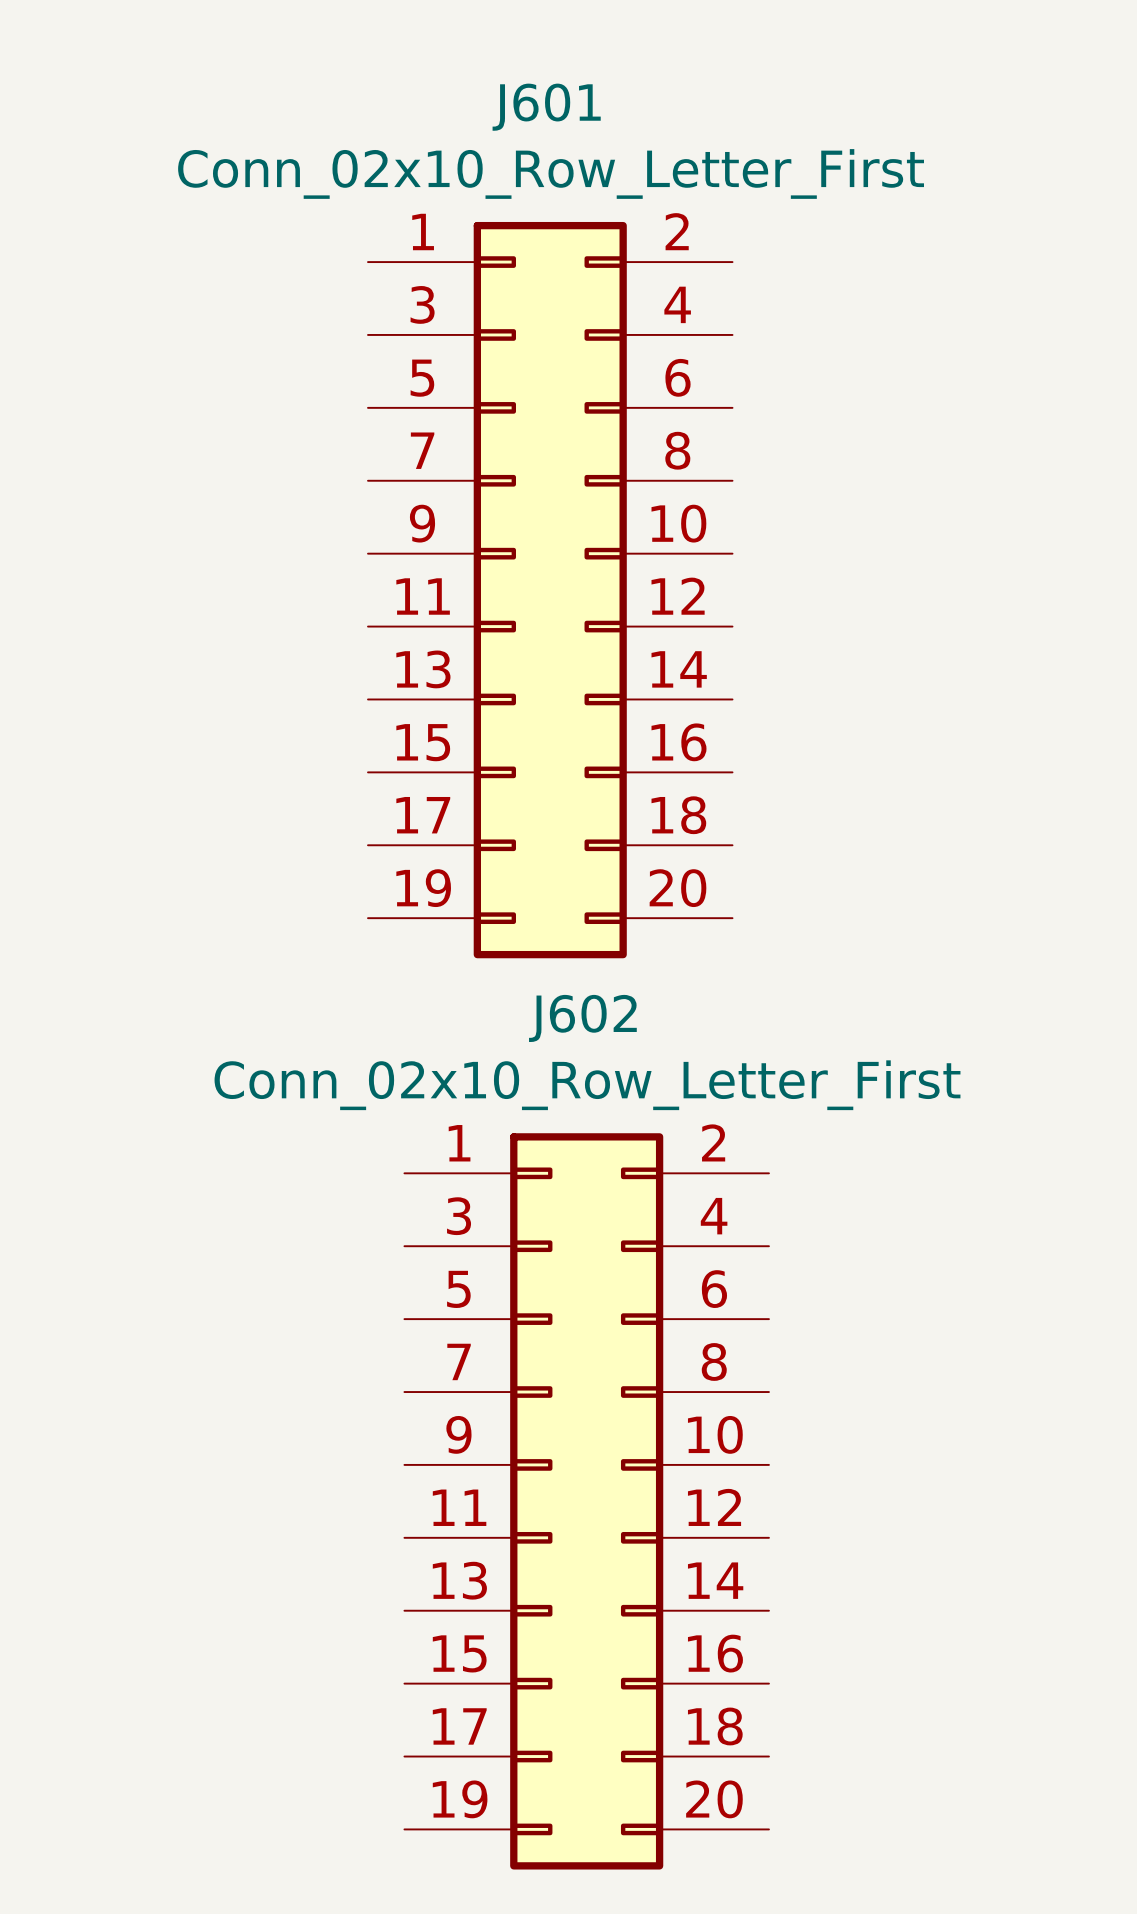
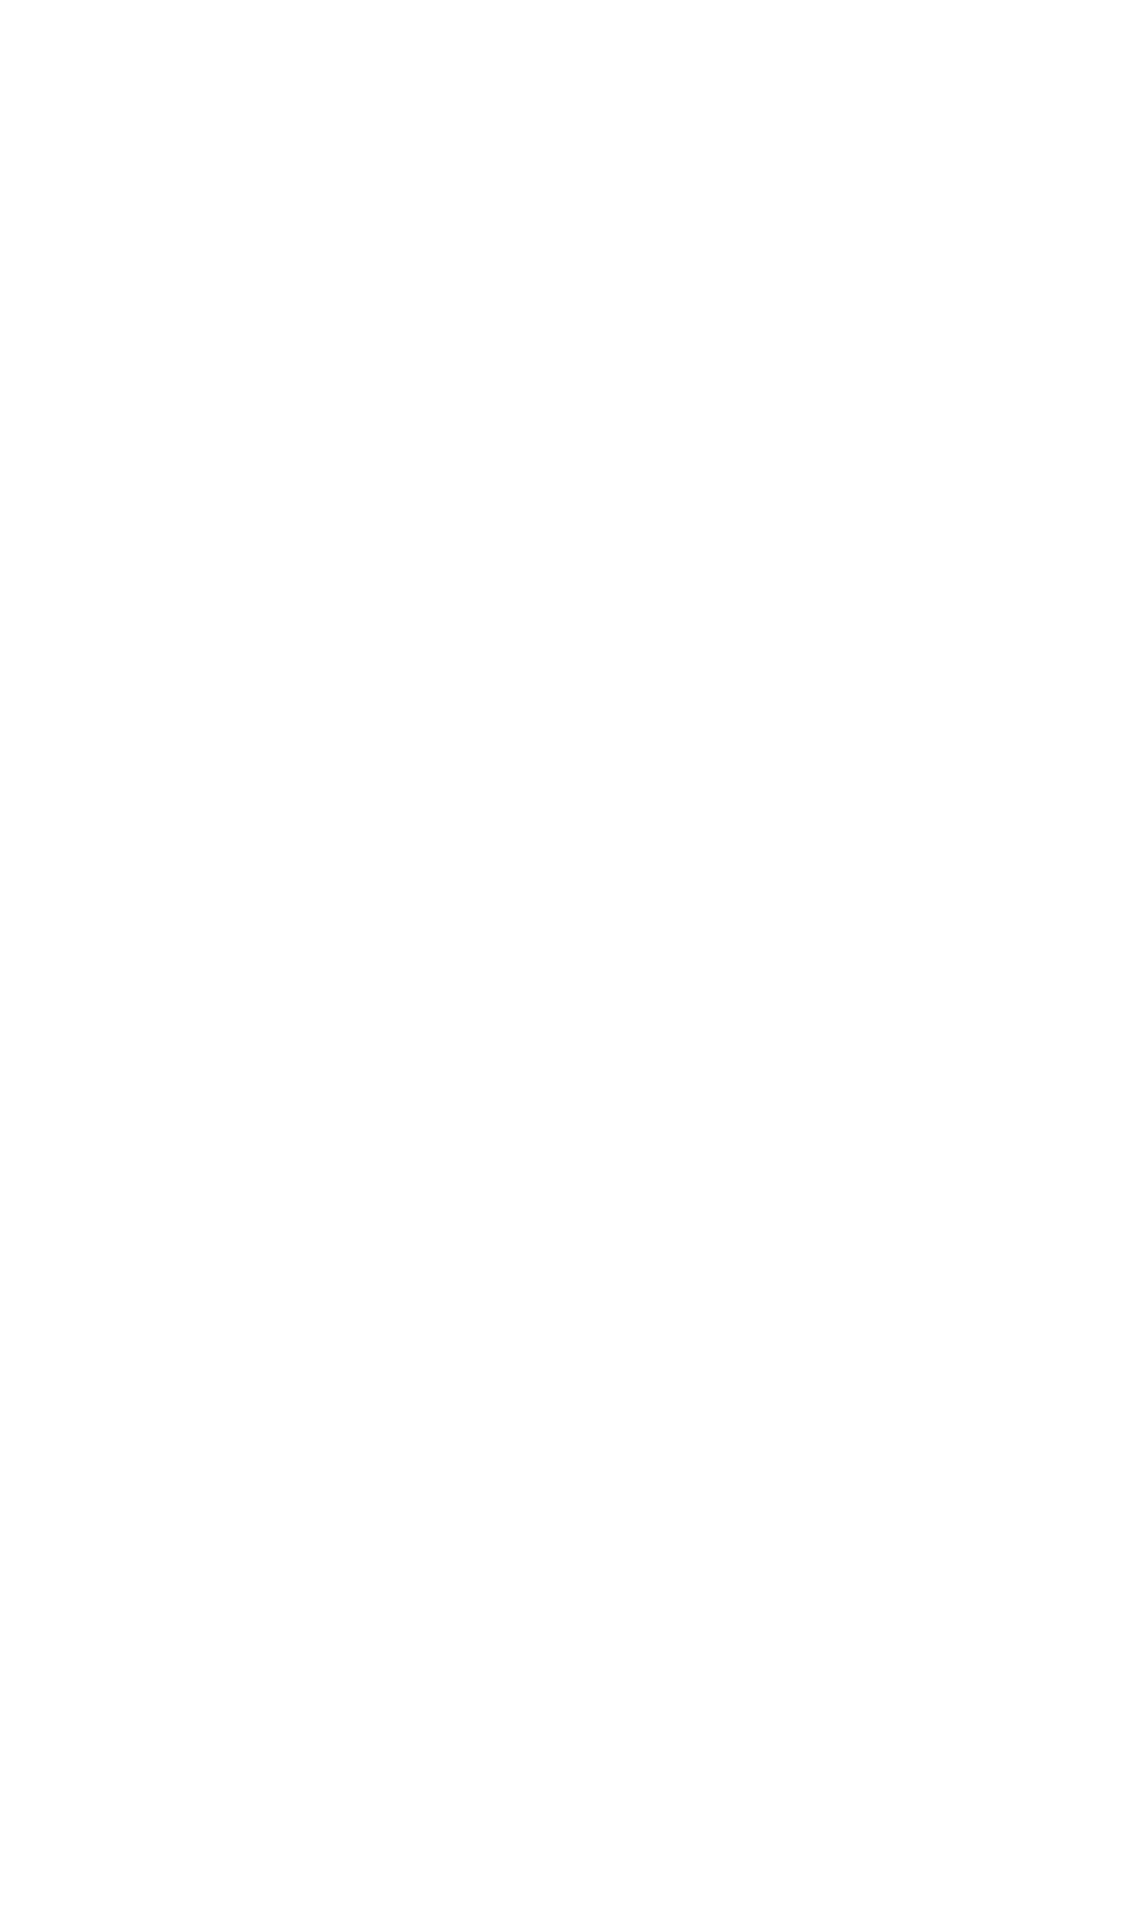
J601: Conn_02x10_Row_Letter_First (550, 590) -> none
J602: Conn_02x10_Row_Letter_First (586, 1501) -> none

